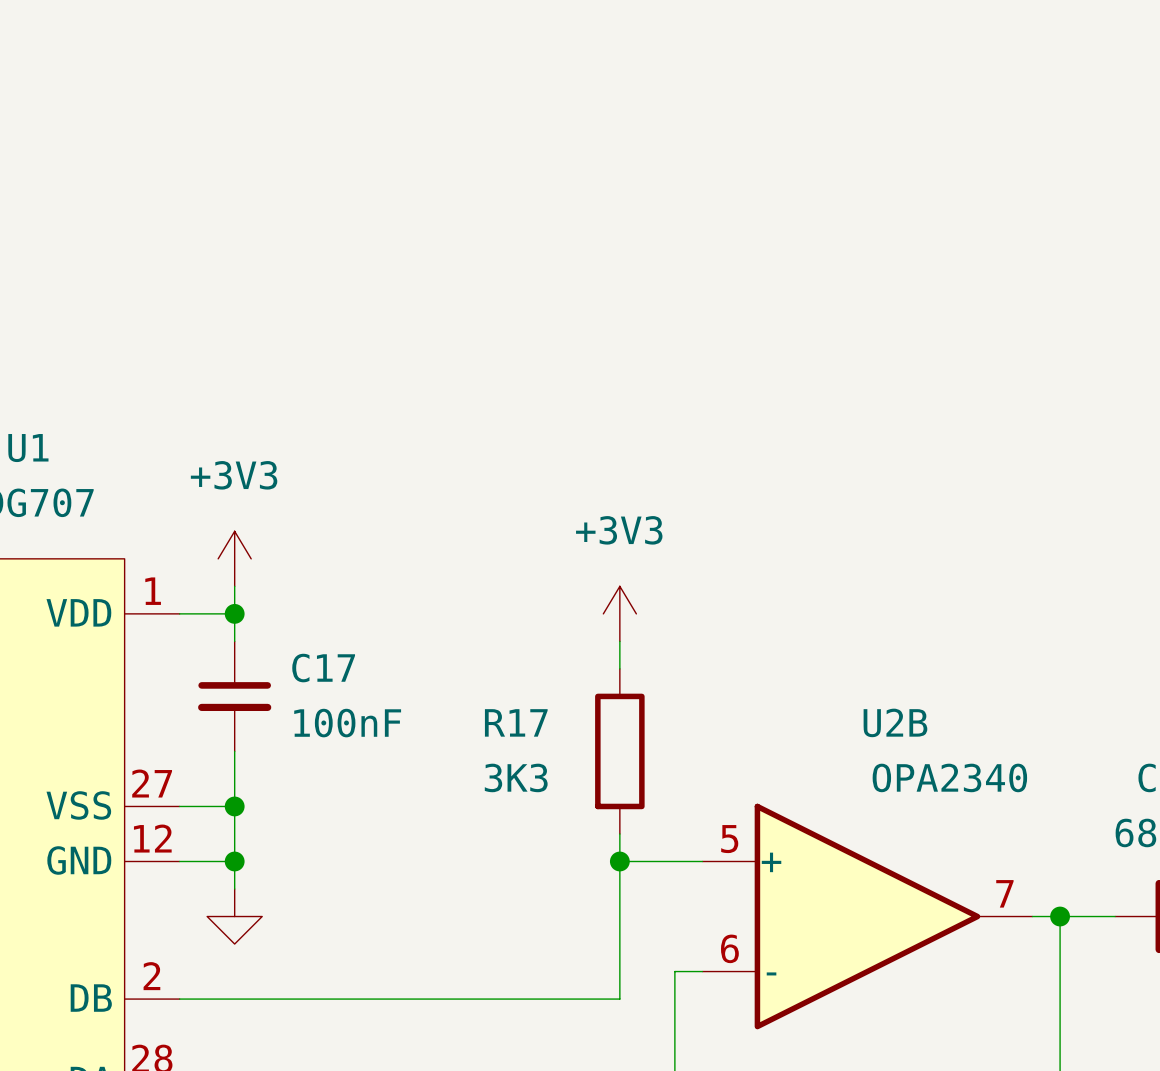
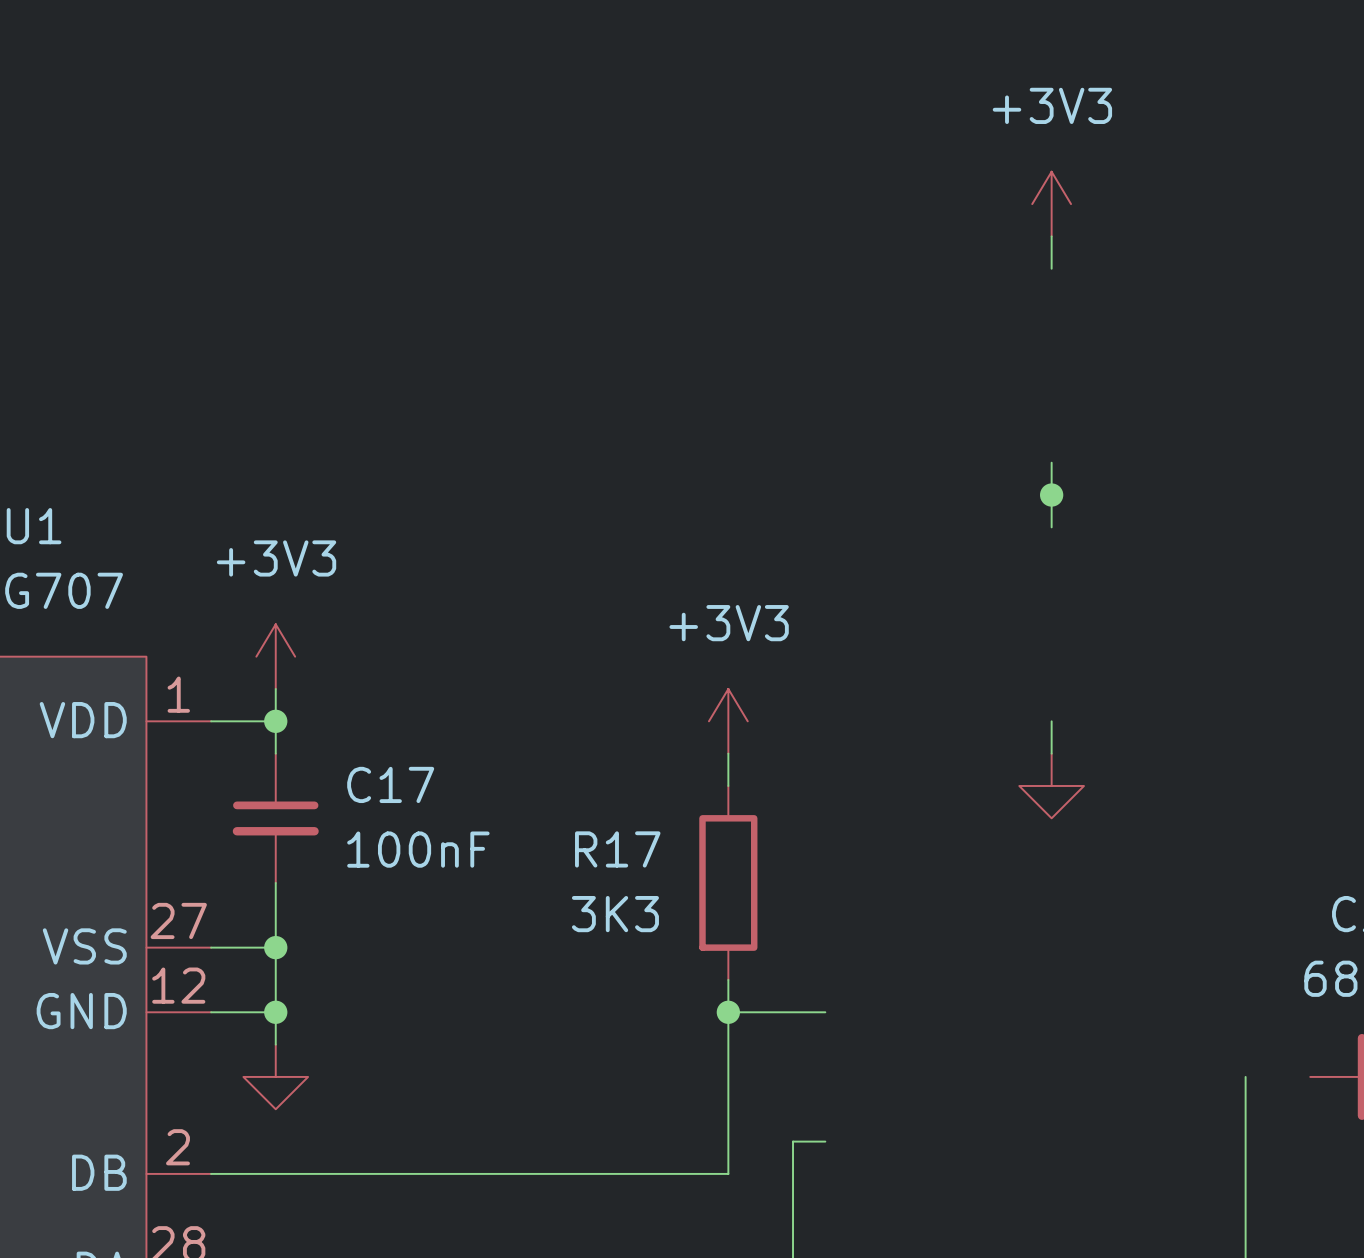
power symbol: none -> +3V3 (1051, 204)
wire: none -> (1051, 236) (1051, 268)
wire: none -> (1051, 462) (1051, 527)
junction: none -> (1051, 495)
wire: none -> (1051, 721) (1051, 753)
power symbol: none -> (1051, 785)
U2B: OPA2340 (867, 916) -> none
wire: (1032, 916) (1115, 916) -> none
junction: (1060, 916) -> none

